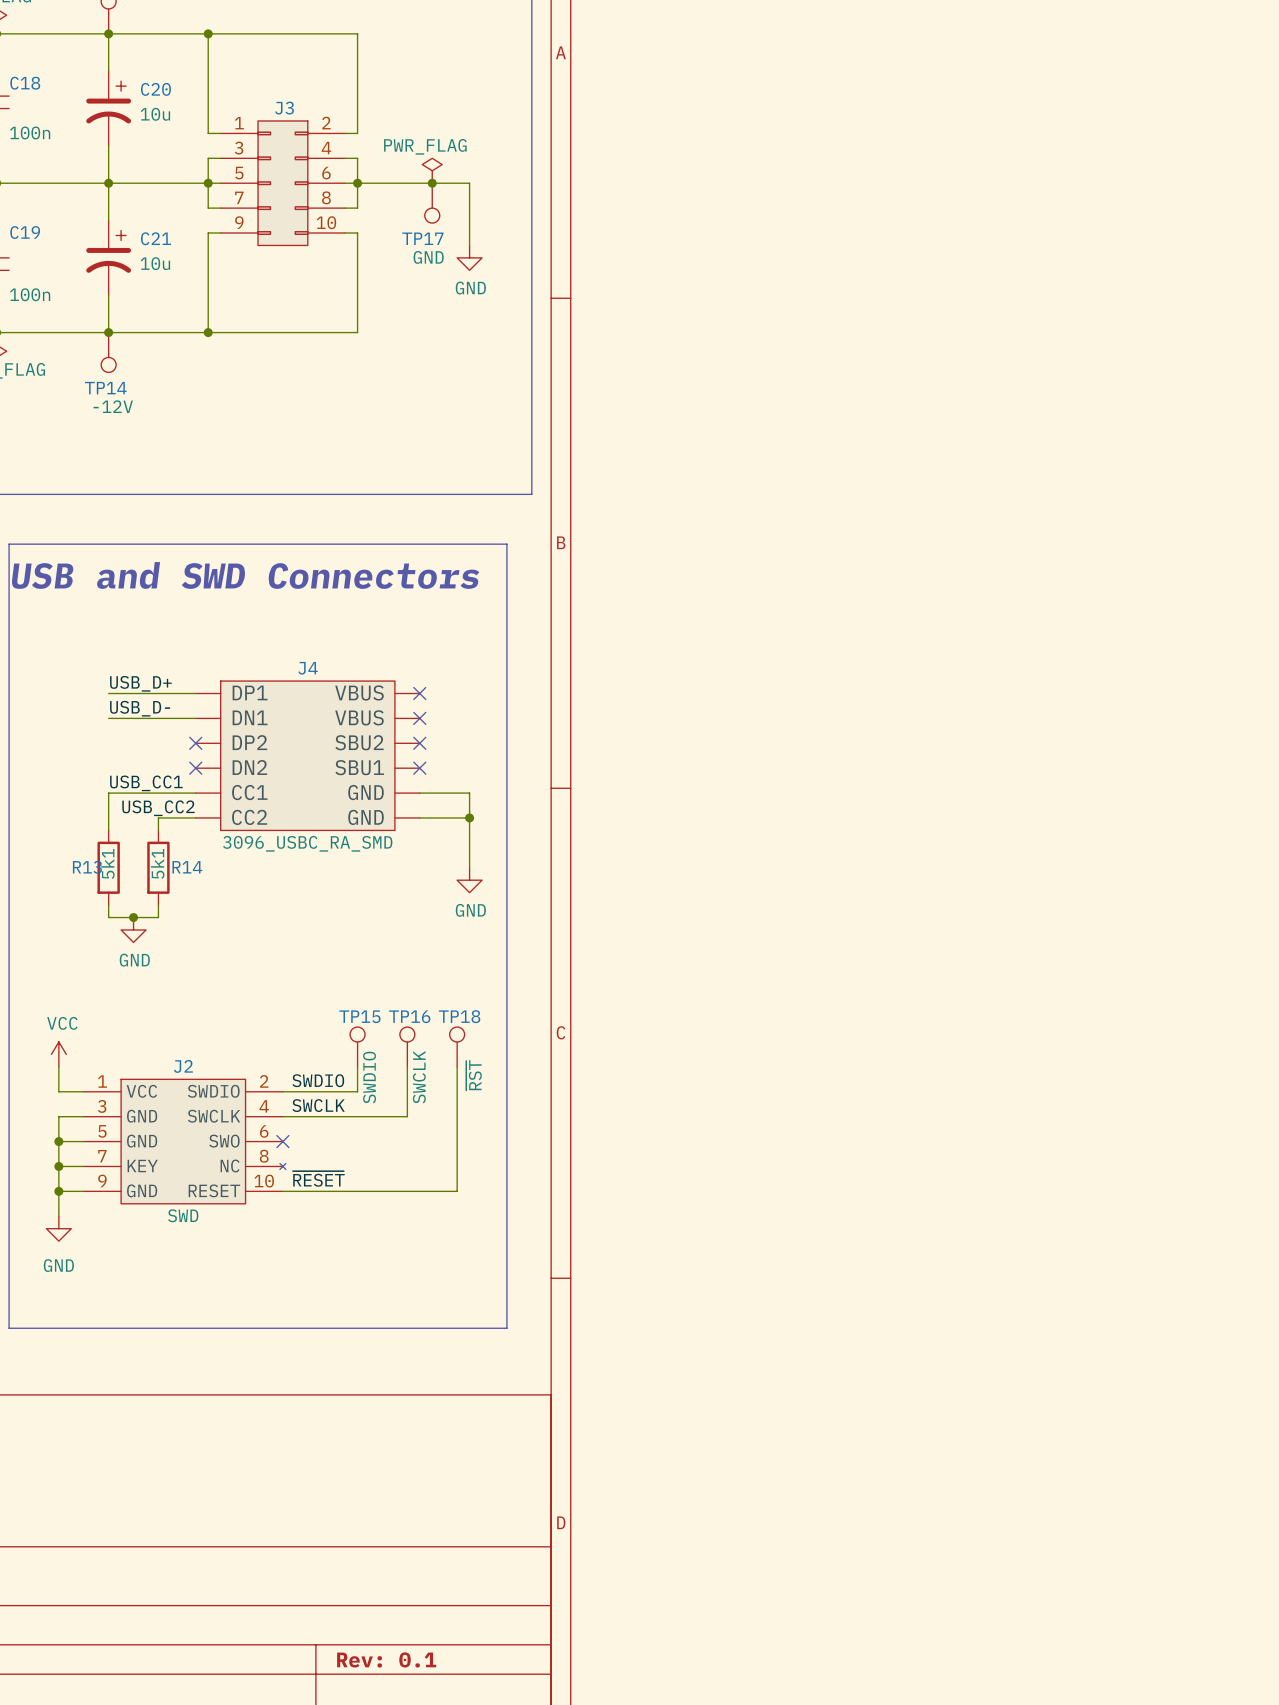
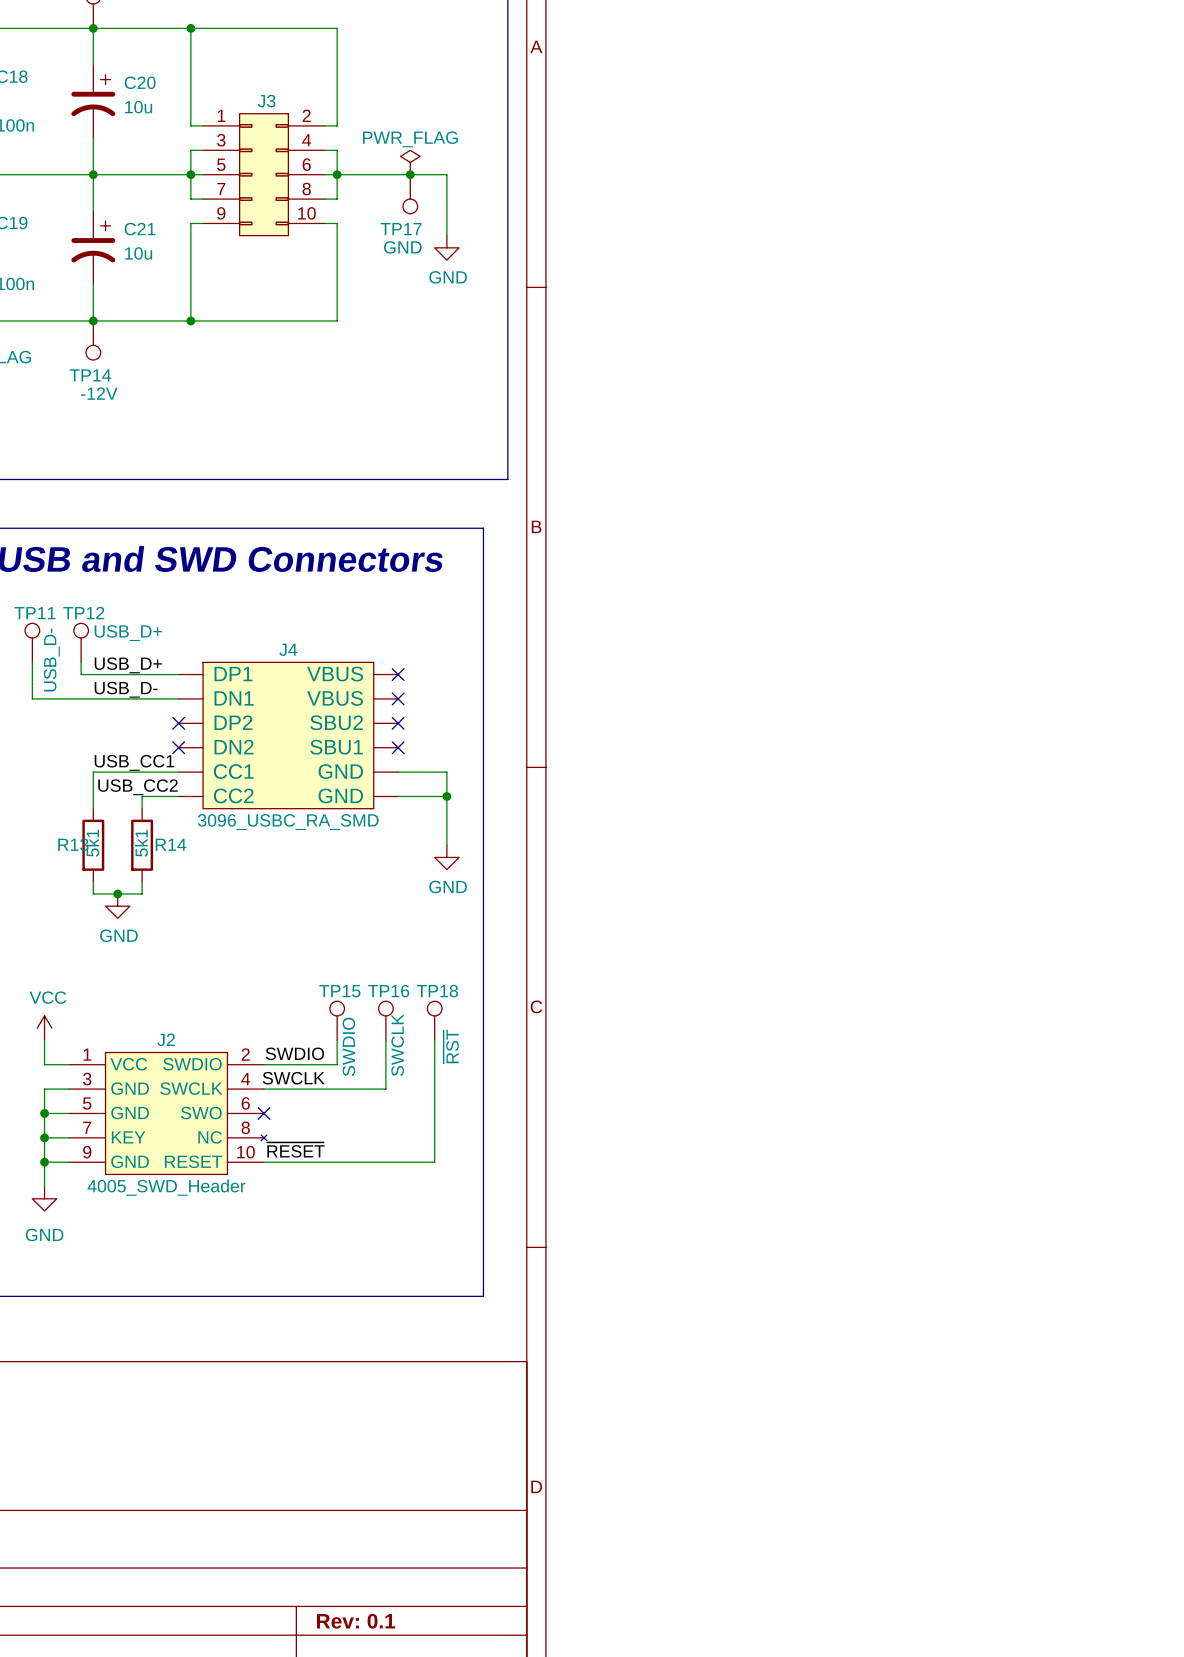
TP11: none -> USB_D- (32, 642)
TP12: none -> USB_D+ (81, 642)
wire: none -> (32, 662) (32, 698) (93, 698)
wire: none -> (81, 662) (81, 674) (93, 674)
J2 value: SWD (183, 1215) -> 4005_SWD_Header (166, 1187)

